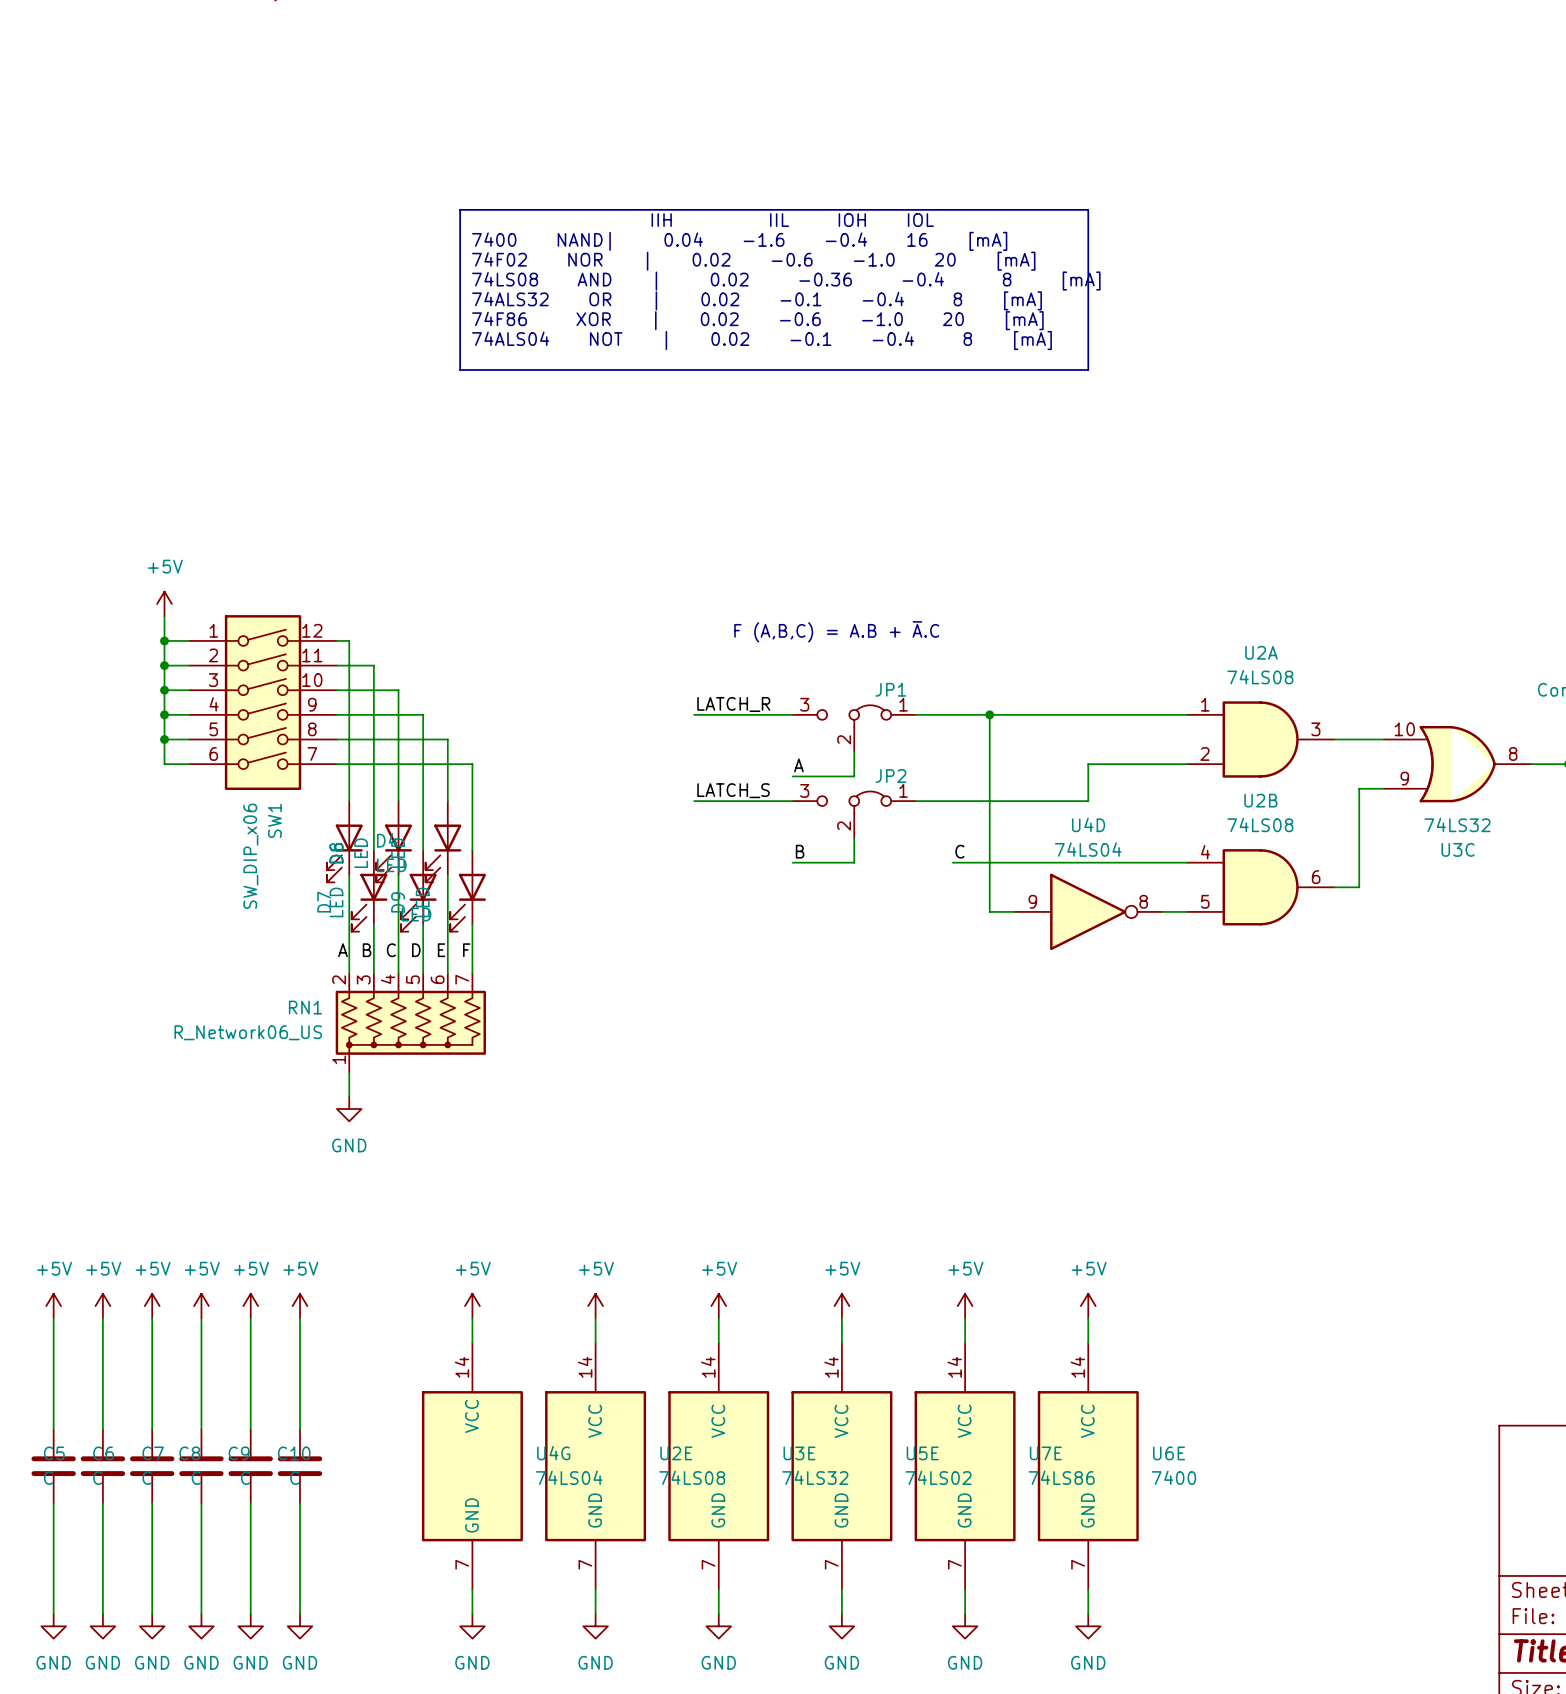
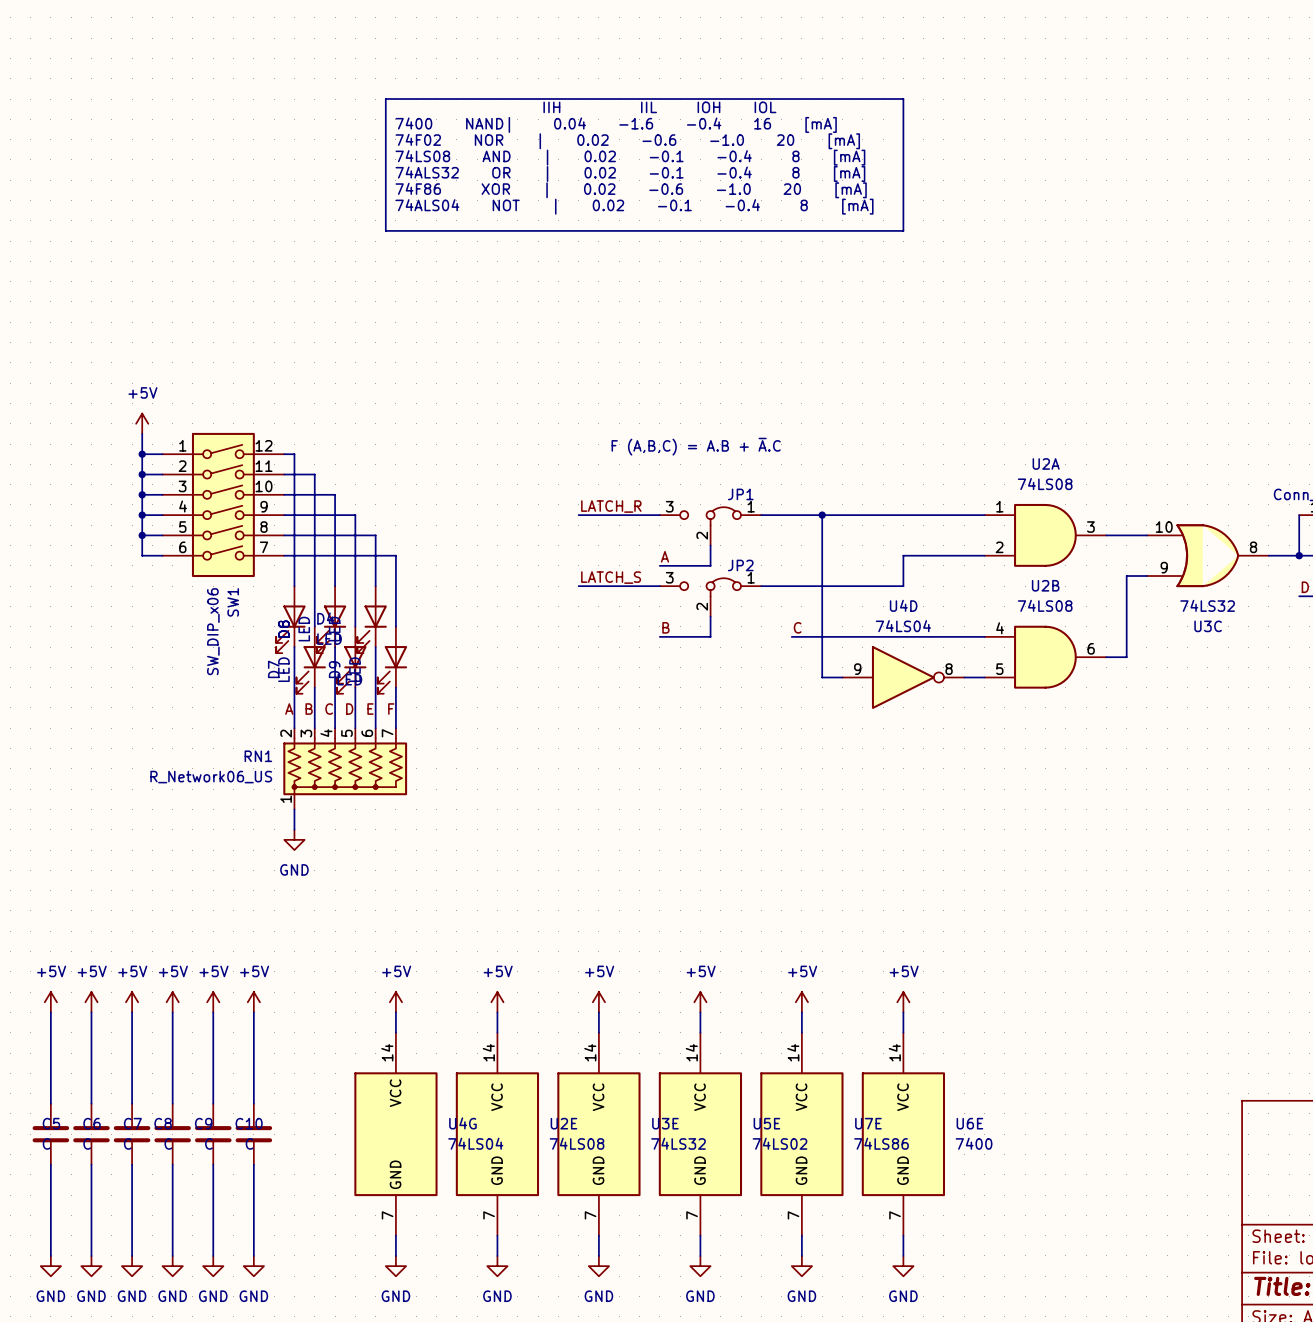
text: 74LS08 AND | 0.02 -0.36 -0.4 8 [mA] (786, 281) -> 74LS08 AND | 0.02 -0.1 -0.4 8 [mA] (630, 157)

